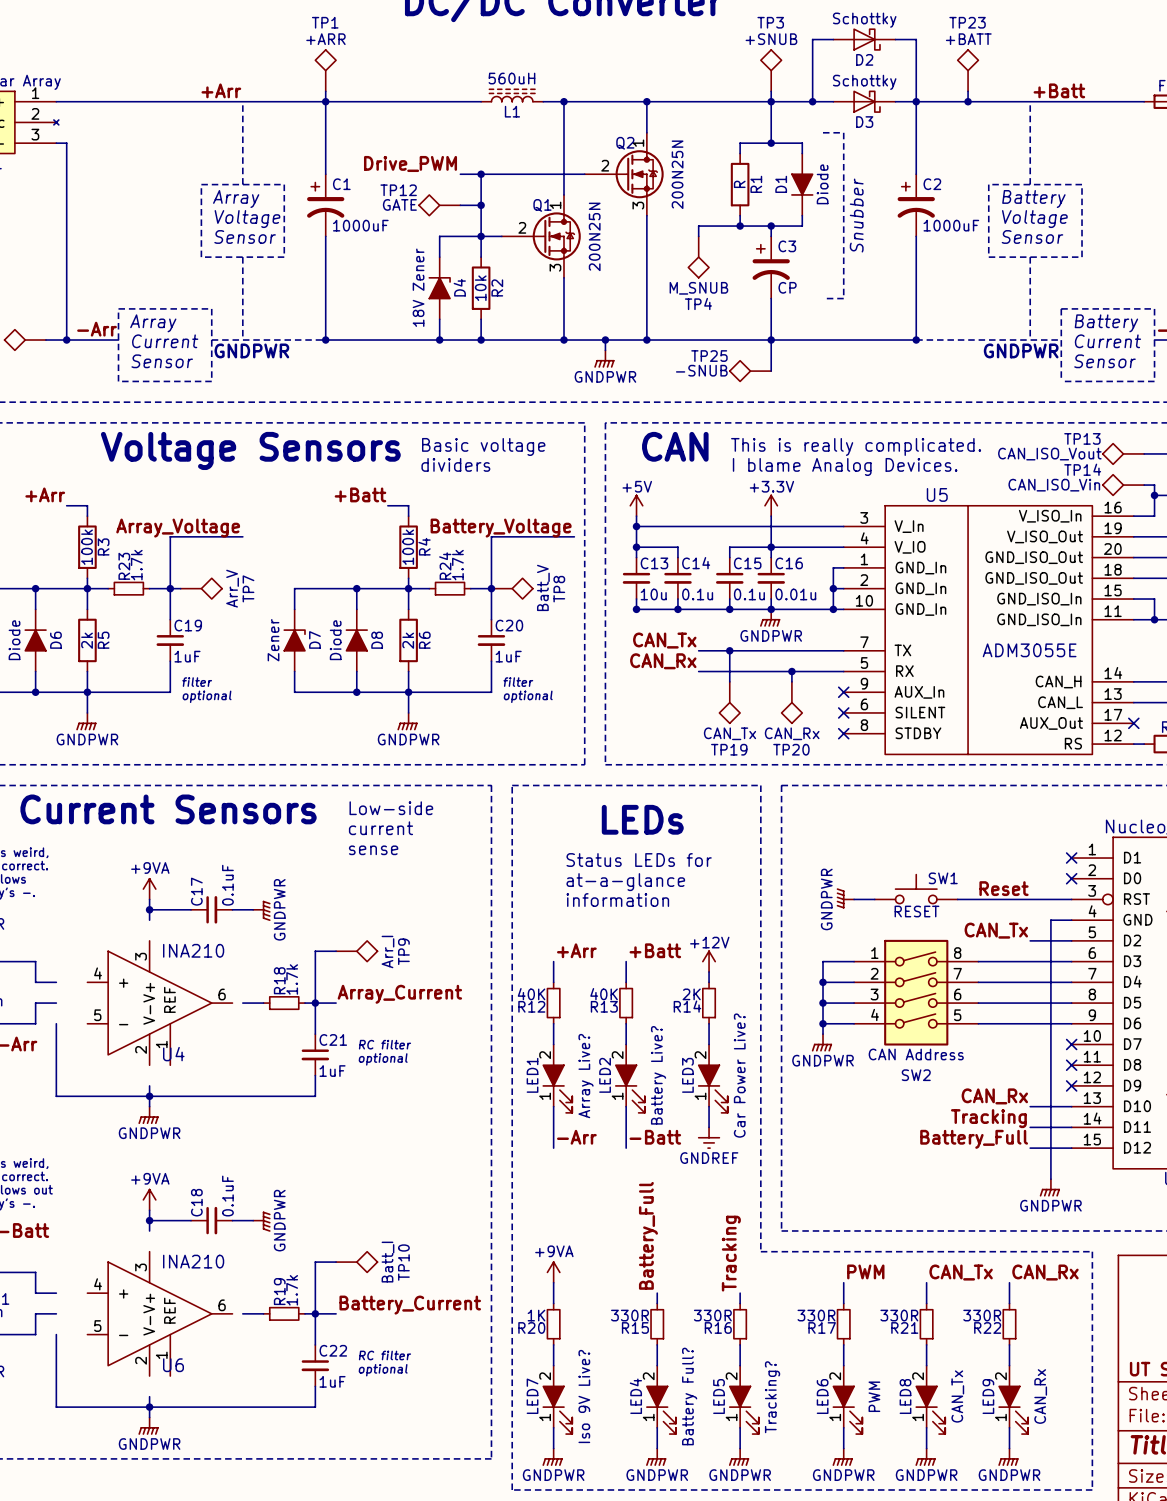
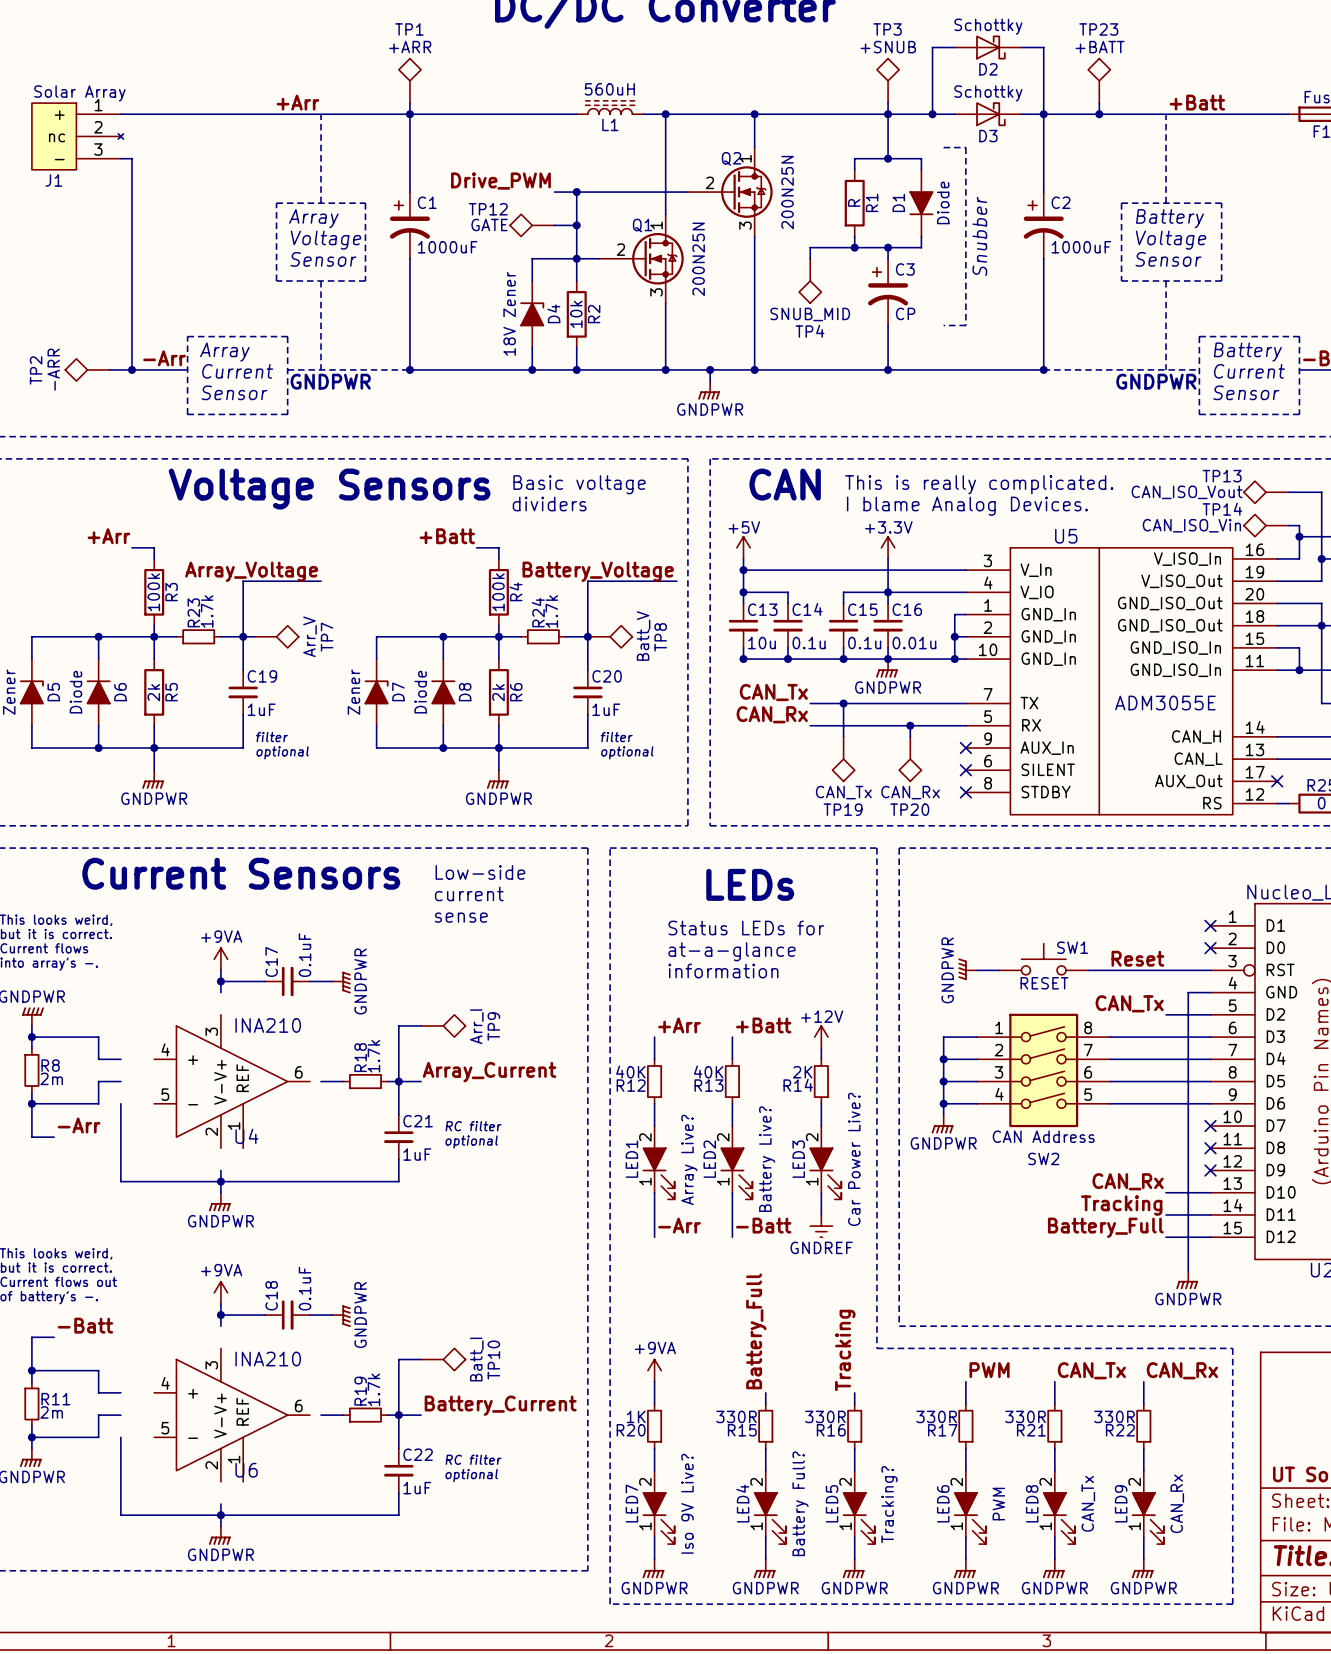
TP4 value: M_SNUB (698, 288) -> SNUB_MID (810, 314)
wire: (771, 340) (771, 371) -> none
TP25: -SNUB (750, 371) -> none

